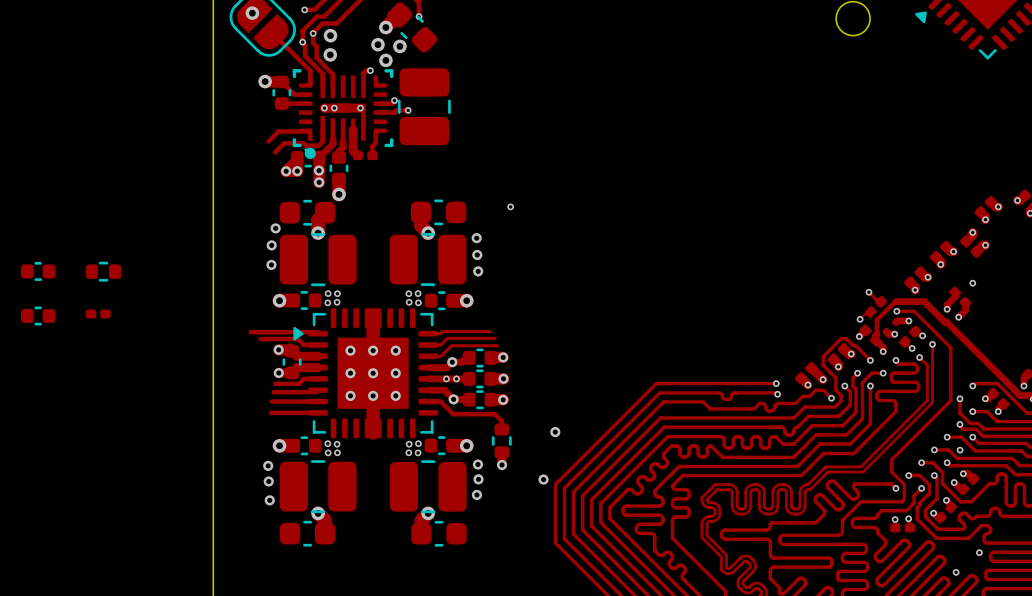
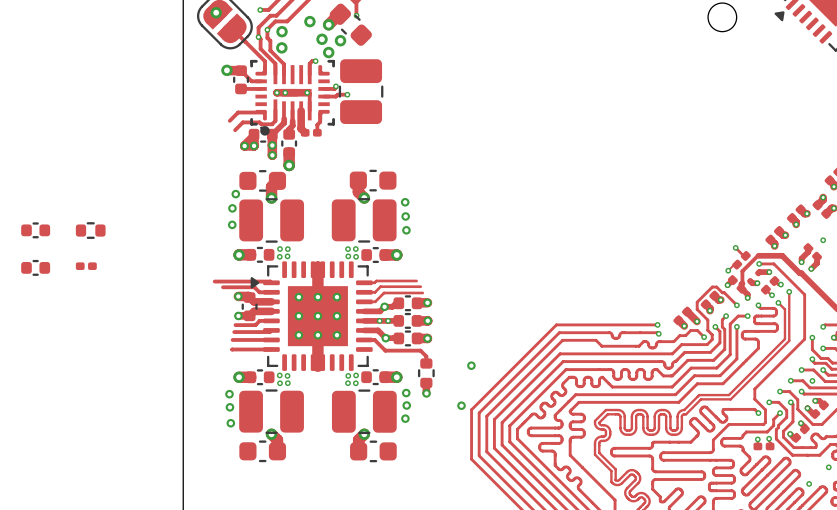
via: none -> (309, 21)
via: (510, 206) -> none

